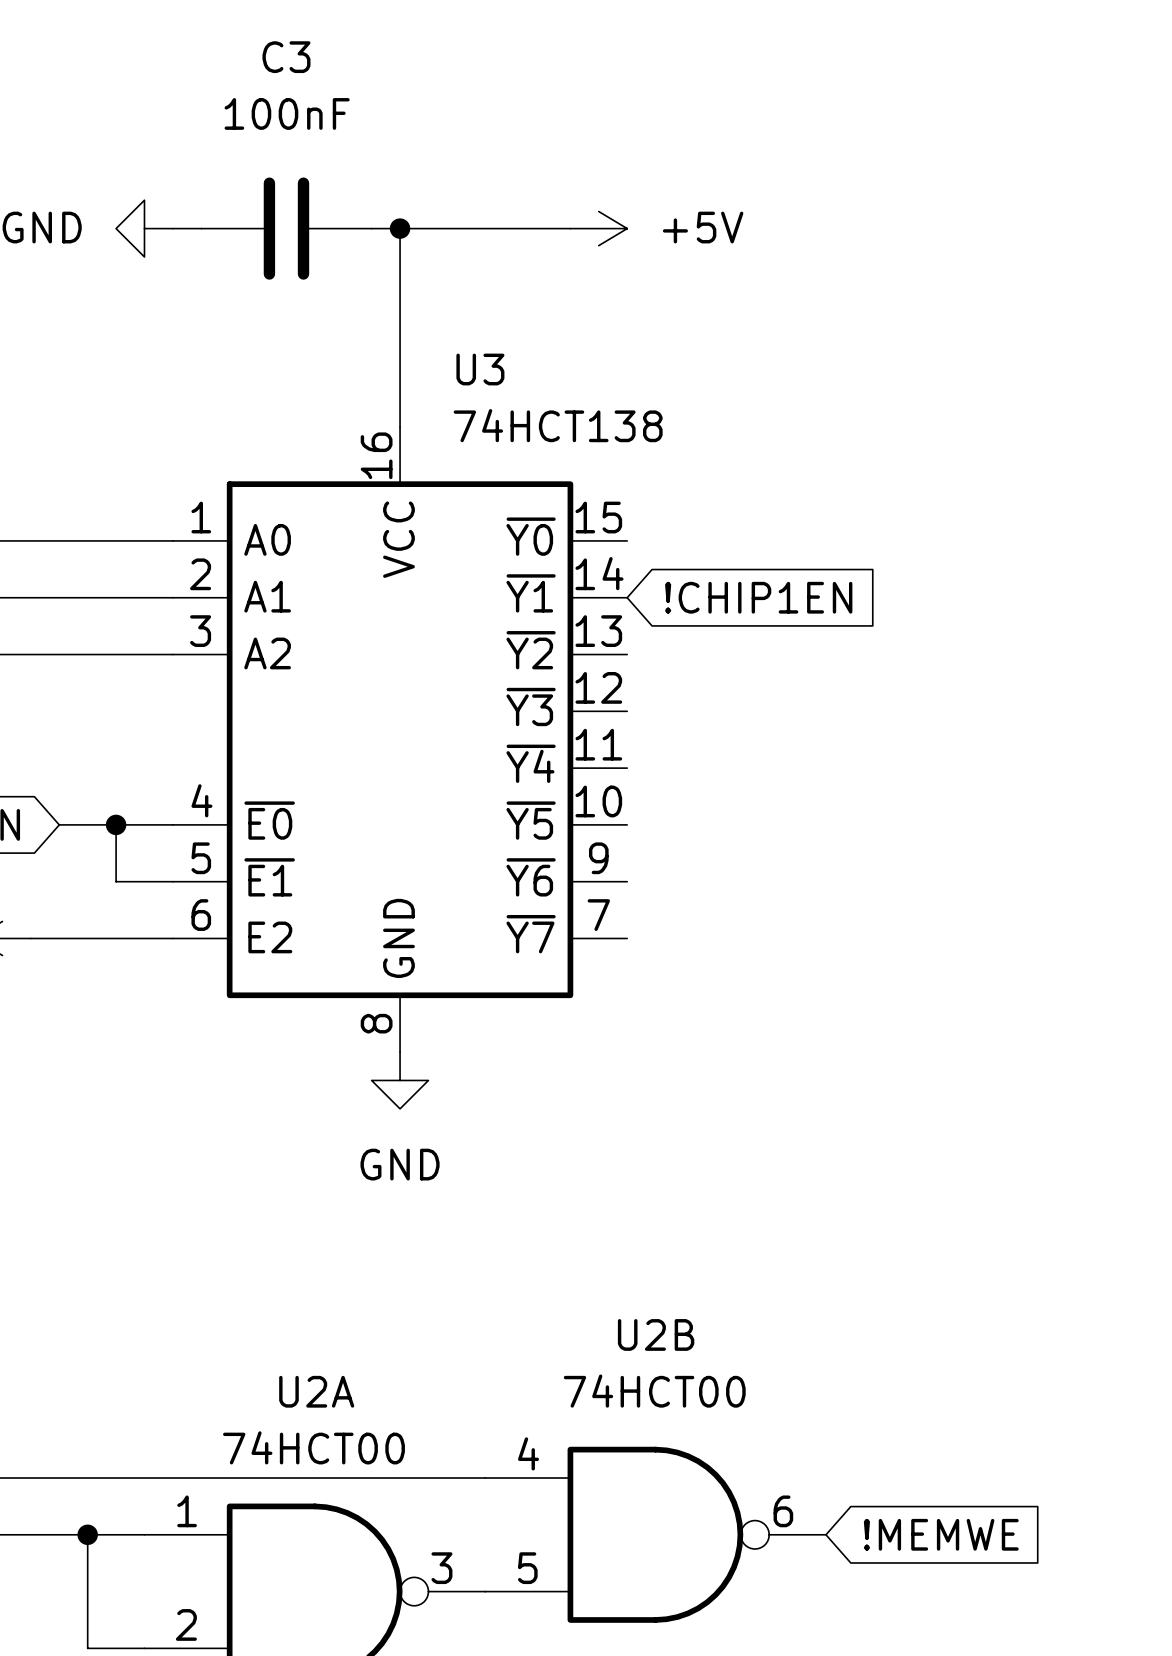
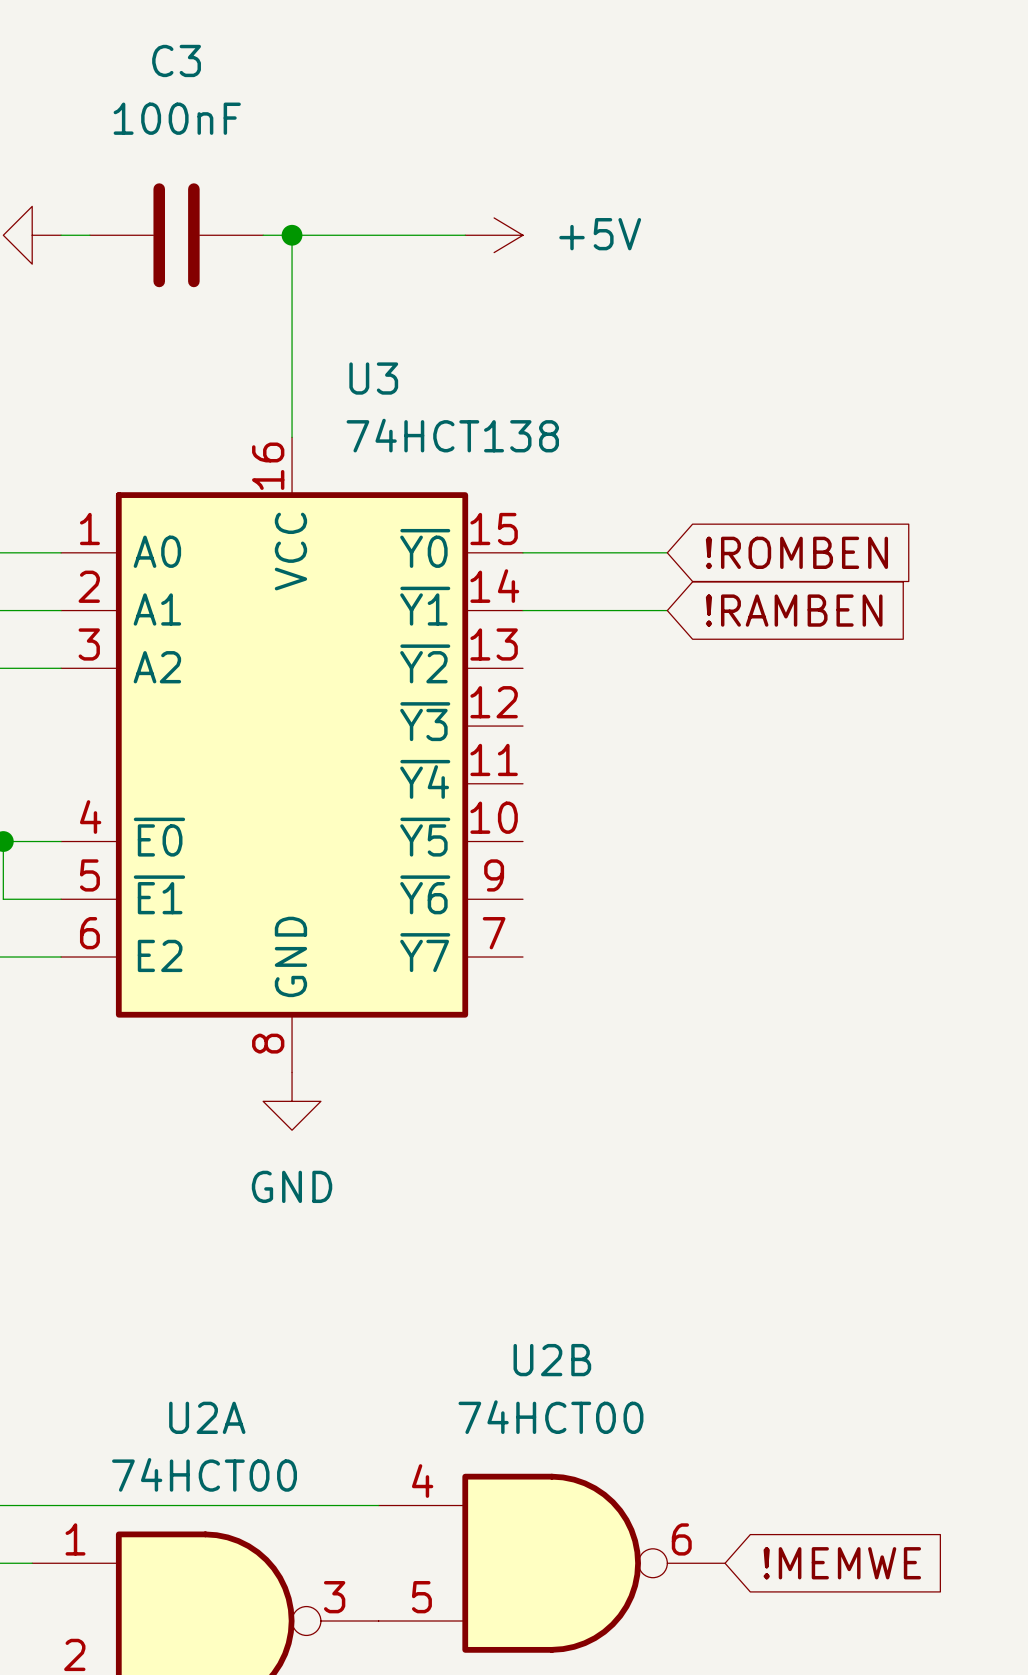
wire: none -> (522, 552) (667, 552)
global label: none -> !ROMBEN (796, 552)
wire: none -> (522, 610) (667, 610)
global label: !CHIP1EN (758, 597) -> none
global label: none -> !RAMBEN (794, 610)

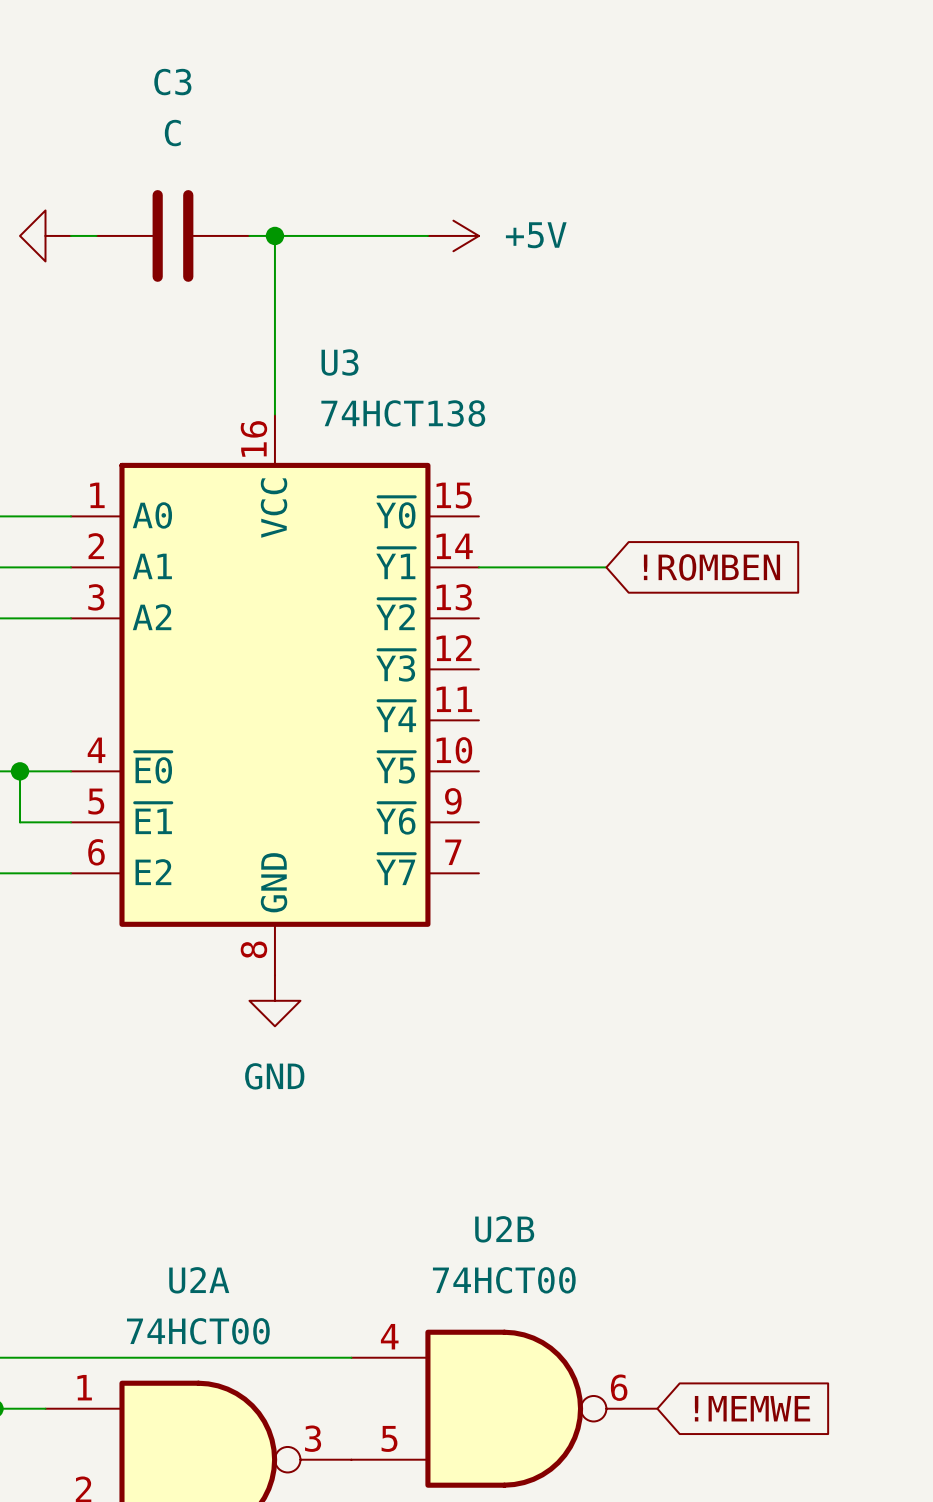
C3 value: 100nF (177, 118) -> C (172, 133)
wire: (522, 552) (667, 552) -> none
global label: !ROMBEN (796, 552) -> none
global label: !RAMBEN (794, 610) -> !ROMBEN (711, 567)

